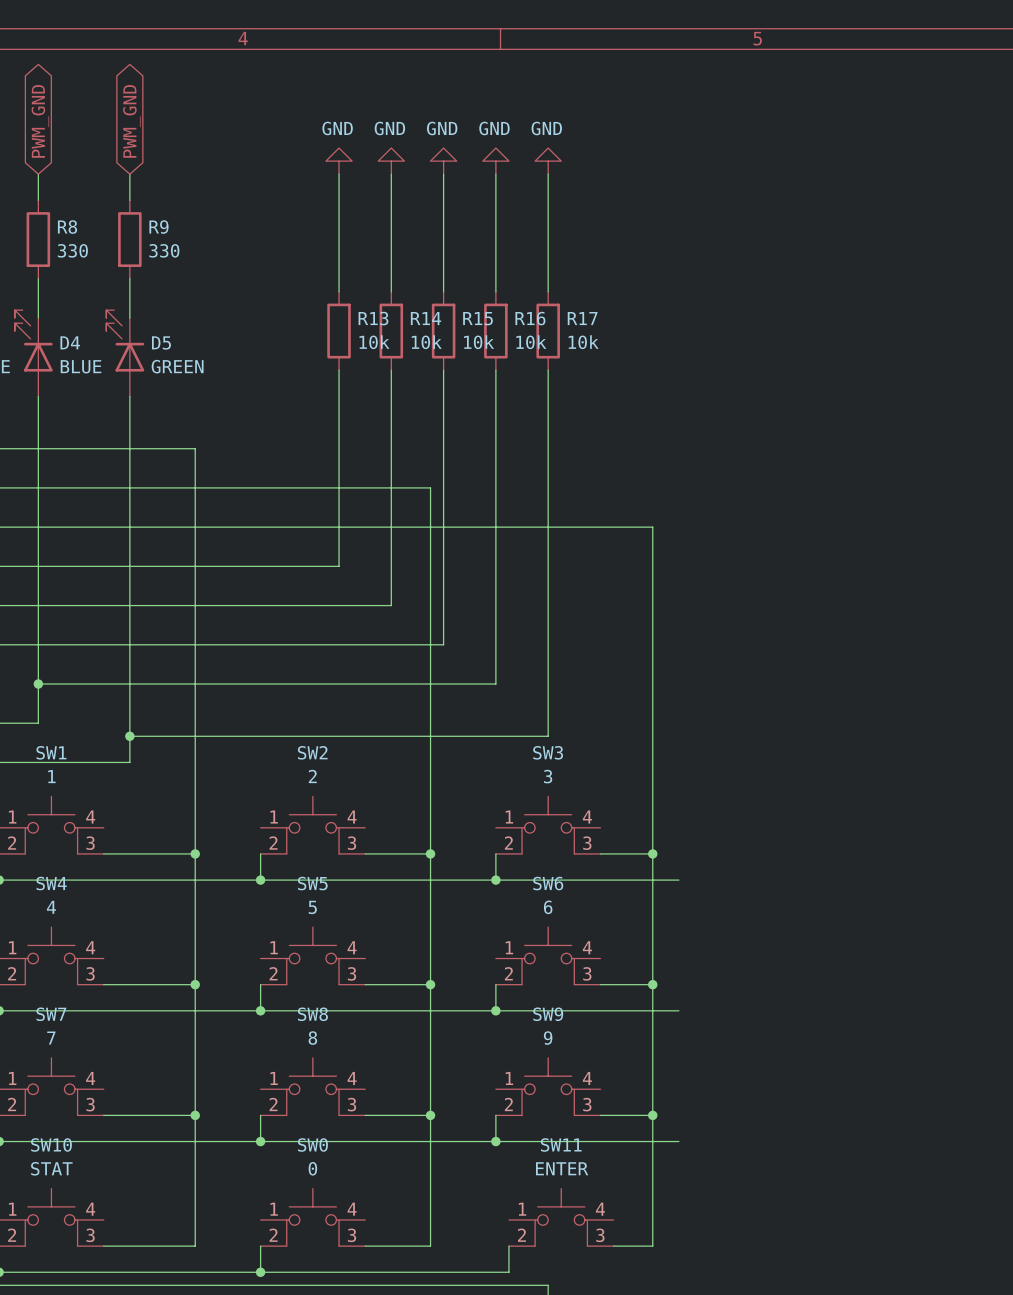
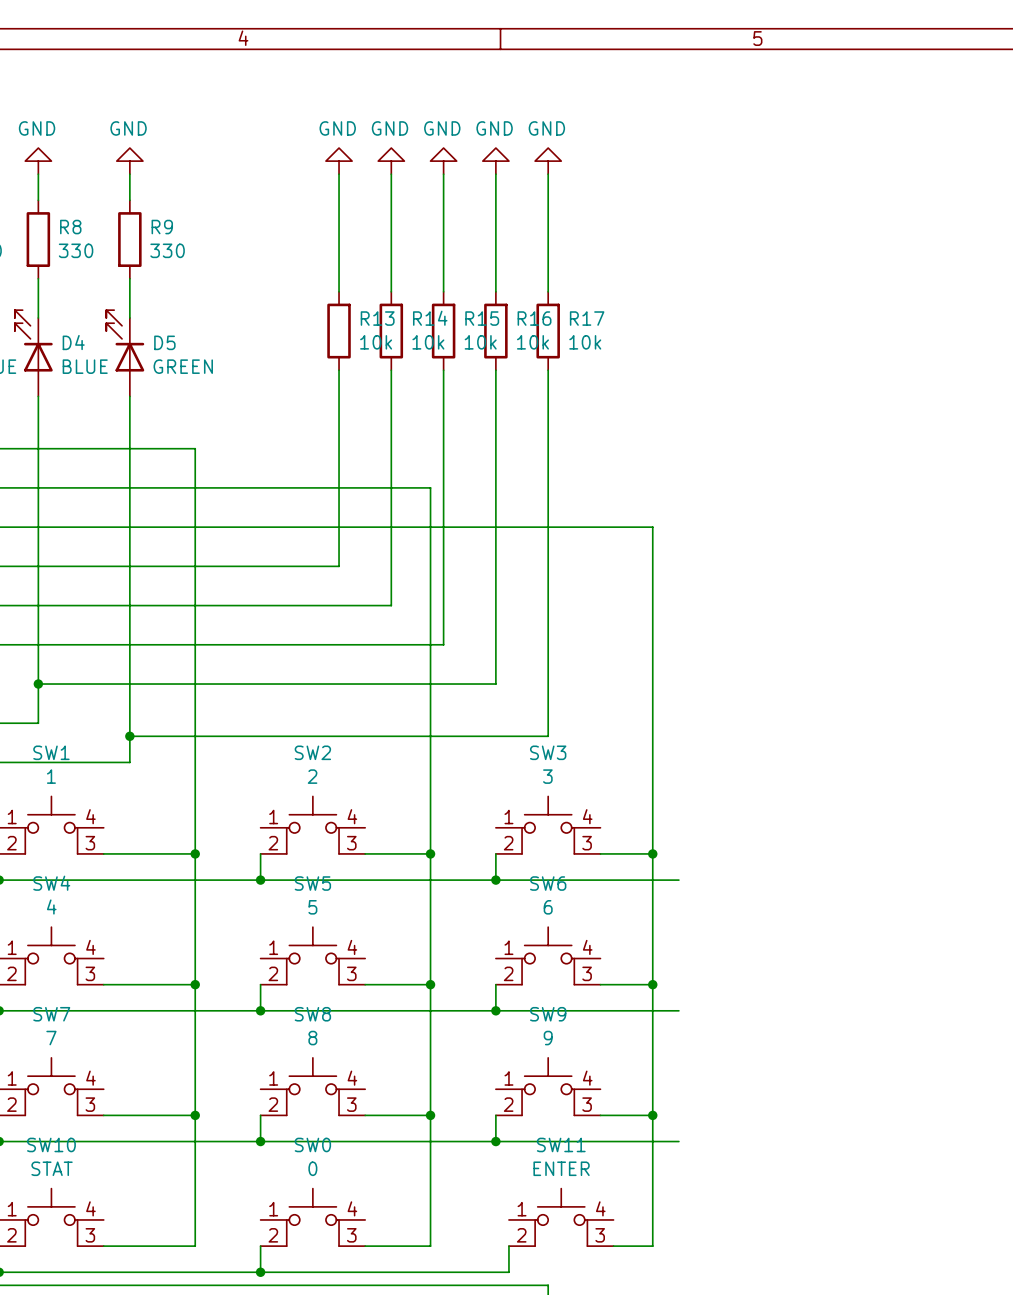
global label: PWM_GND (40, 121) -> none
global label: PWM_GND (131, 121) -> none
power symbol: none -> GND (38, 161)
power symbol: none -> GND (129, 161)

